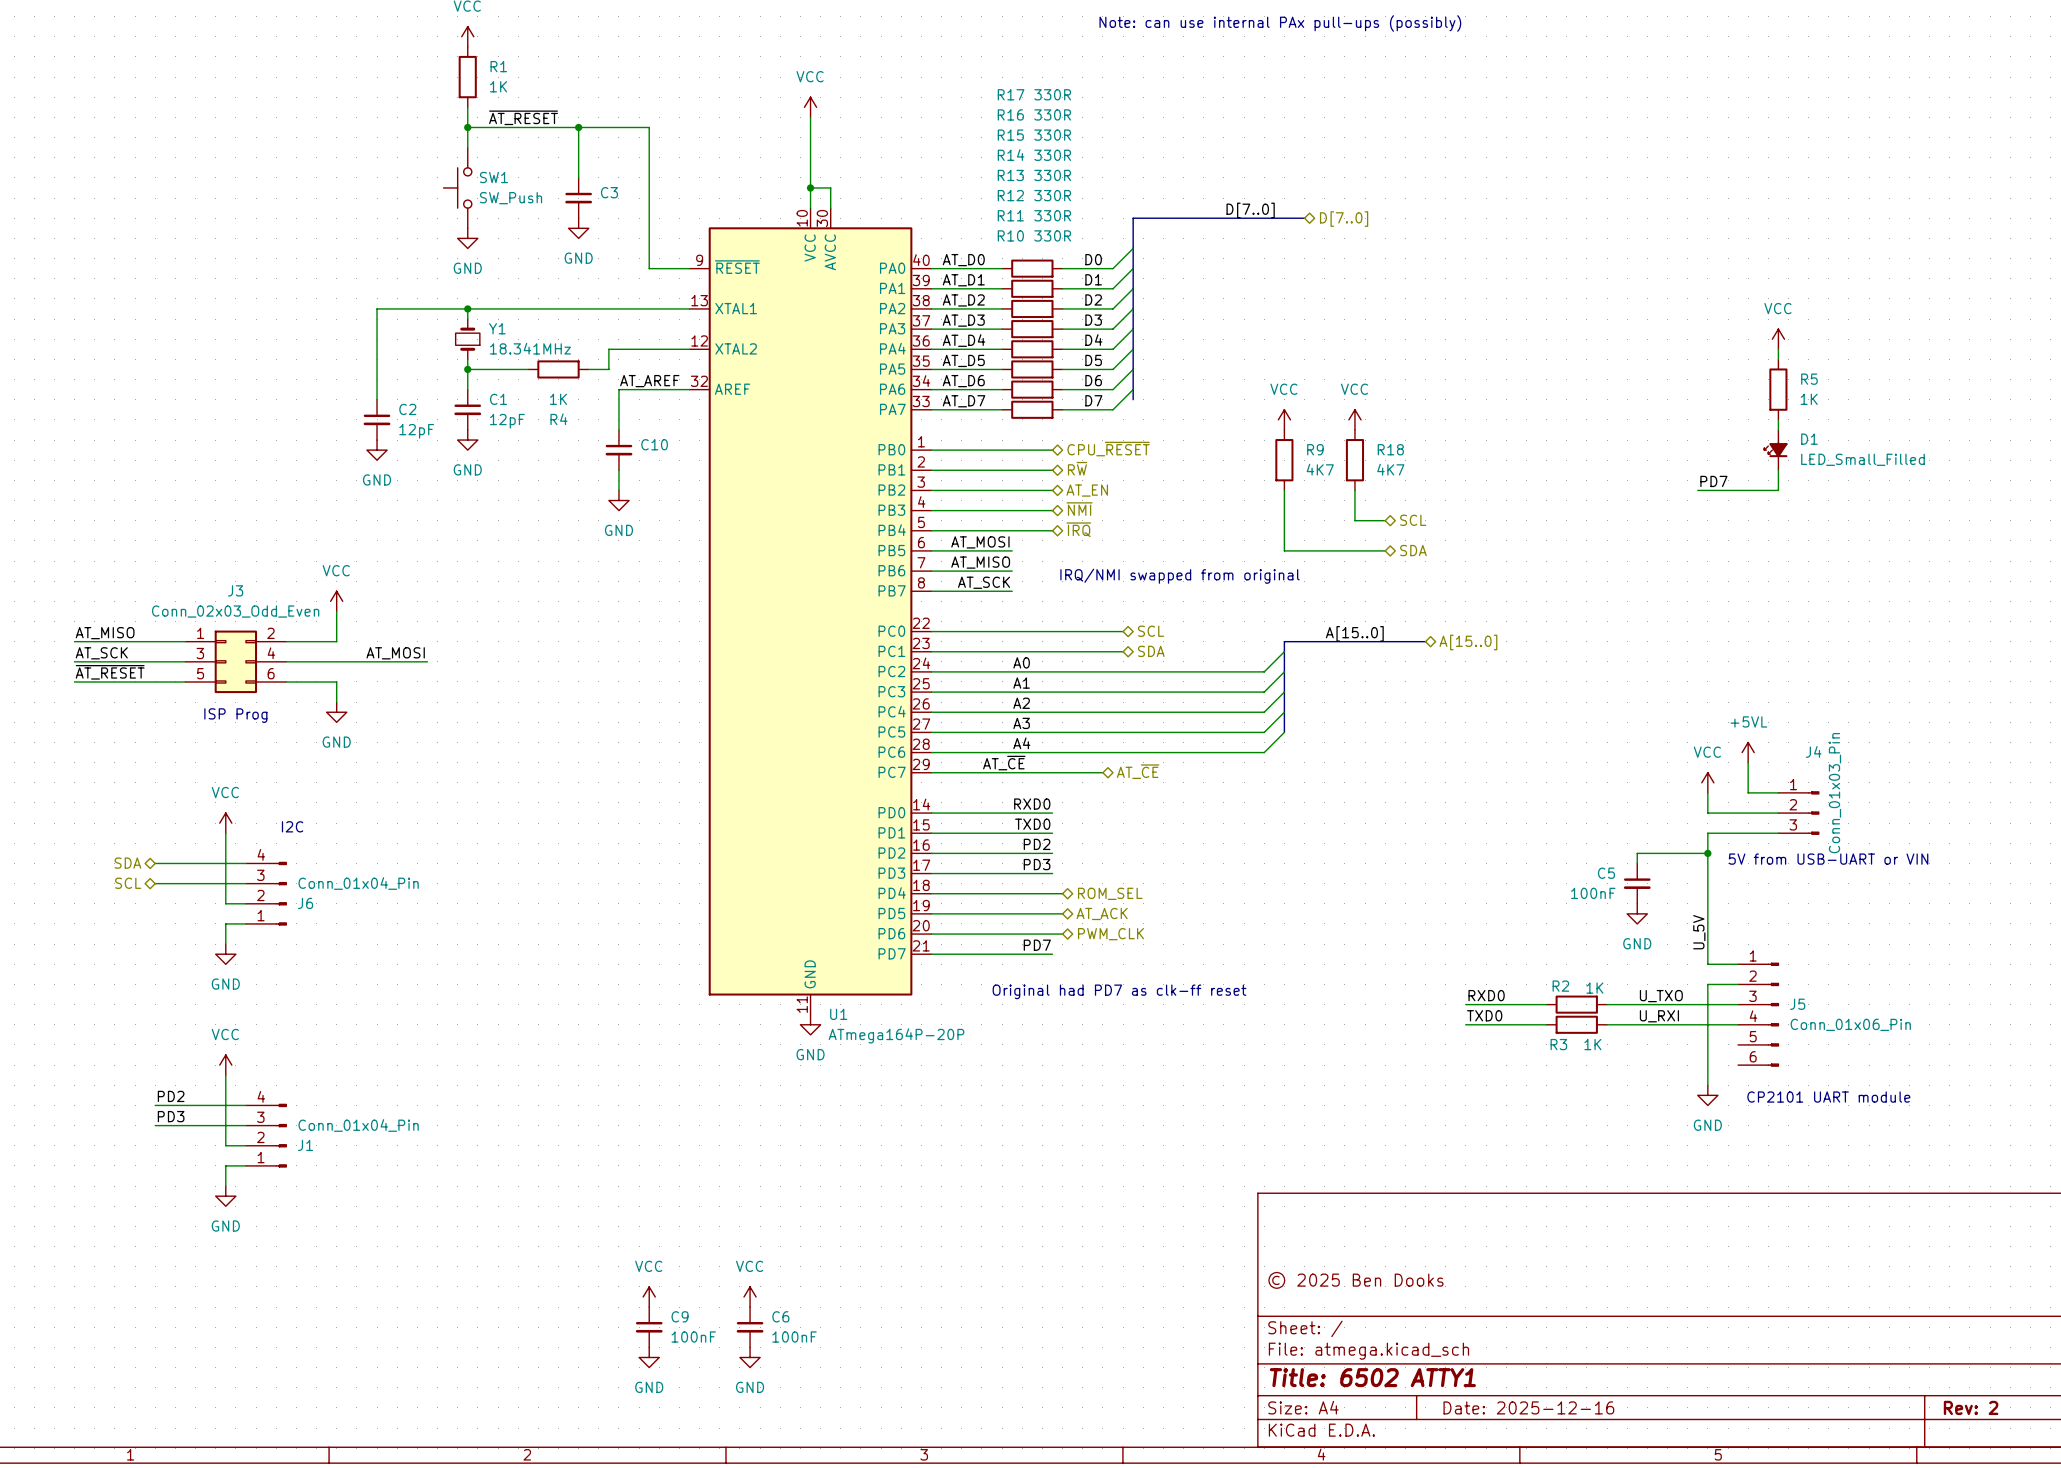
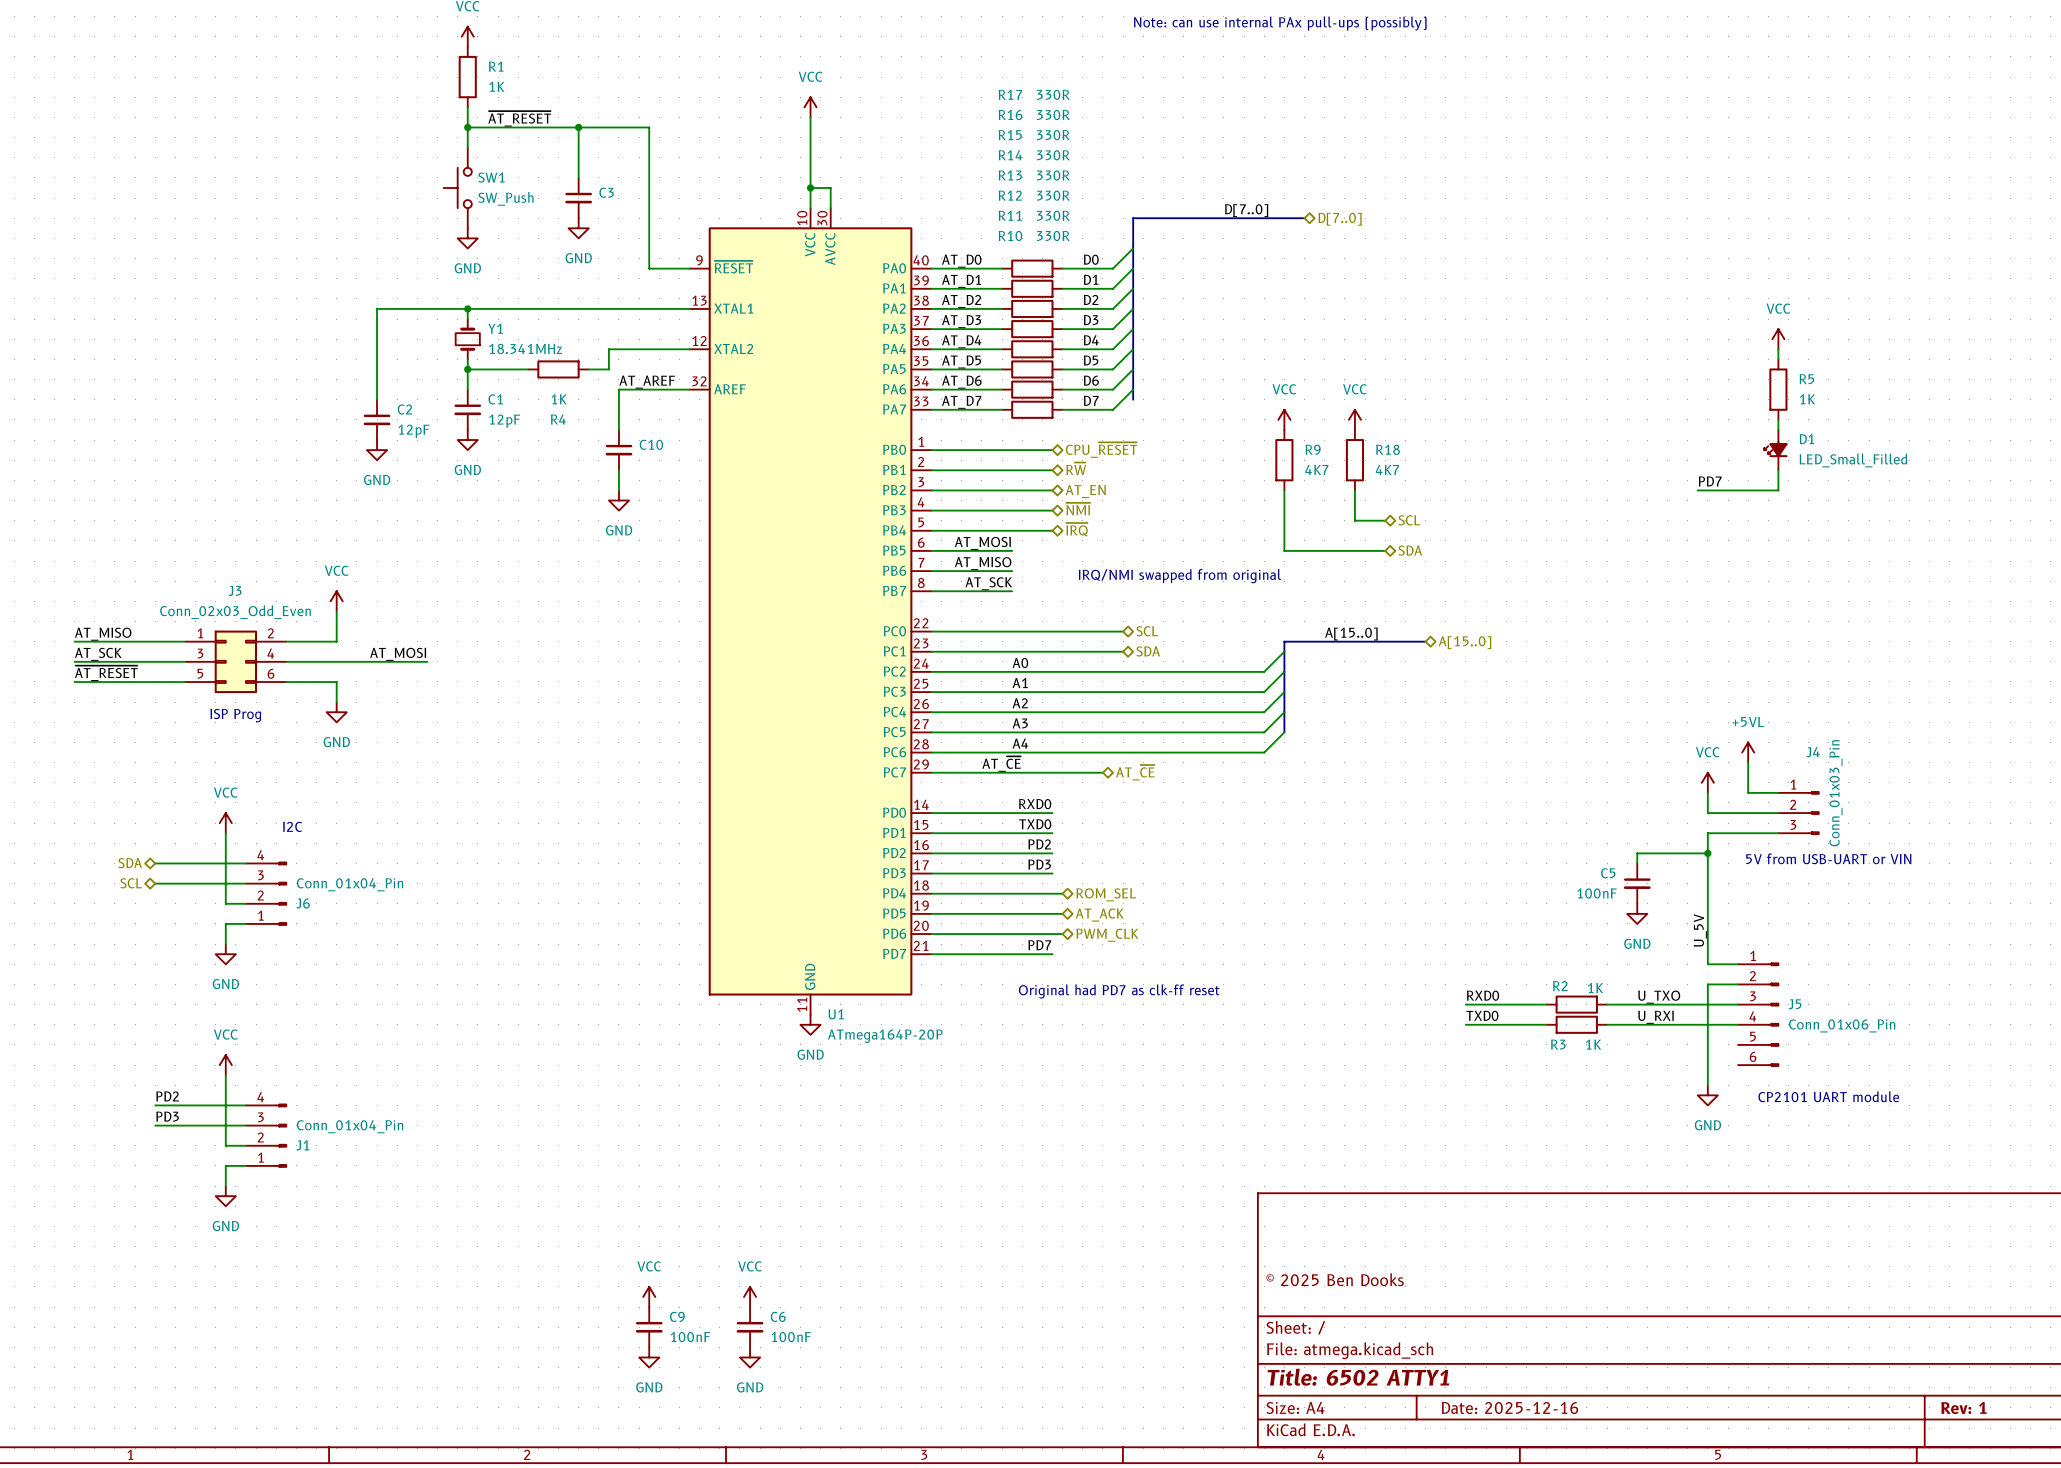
title block: Rev: 2 (1971, 1407) -> Rev: 1 (1963, 1408)

